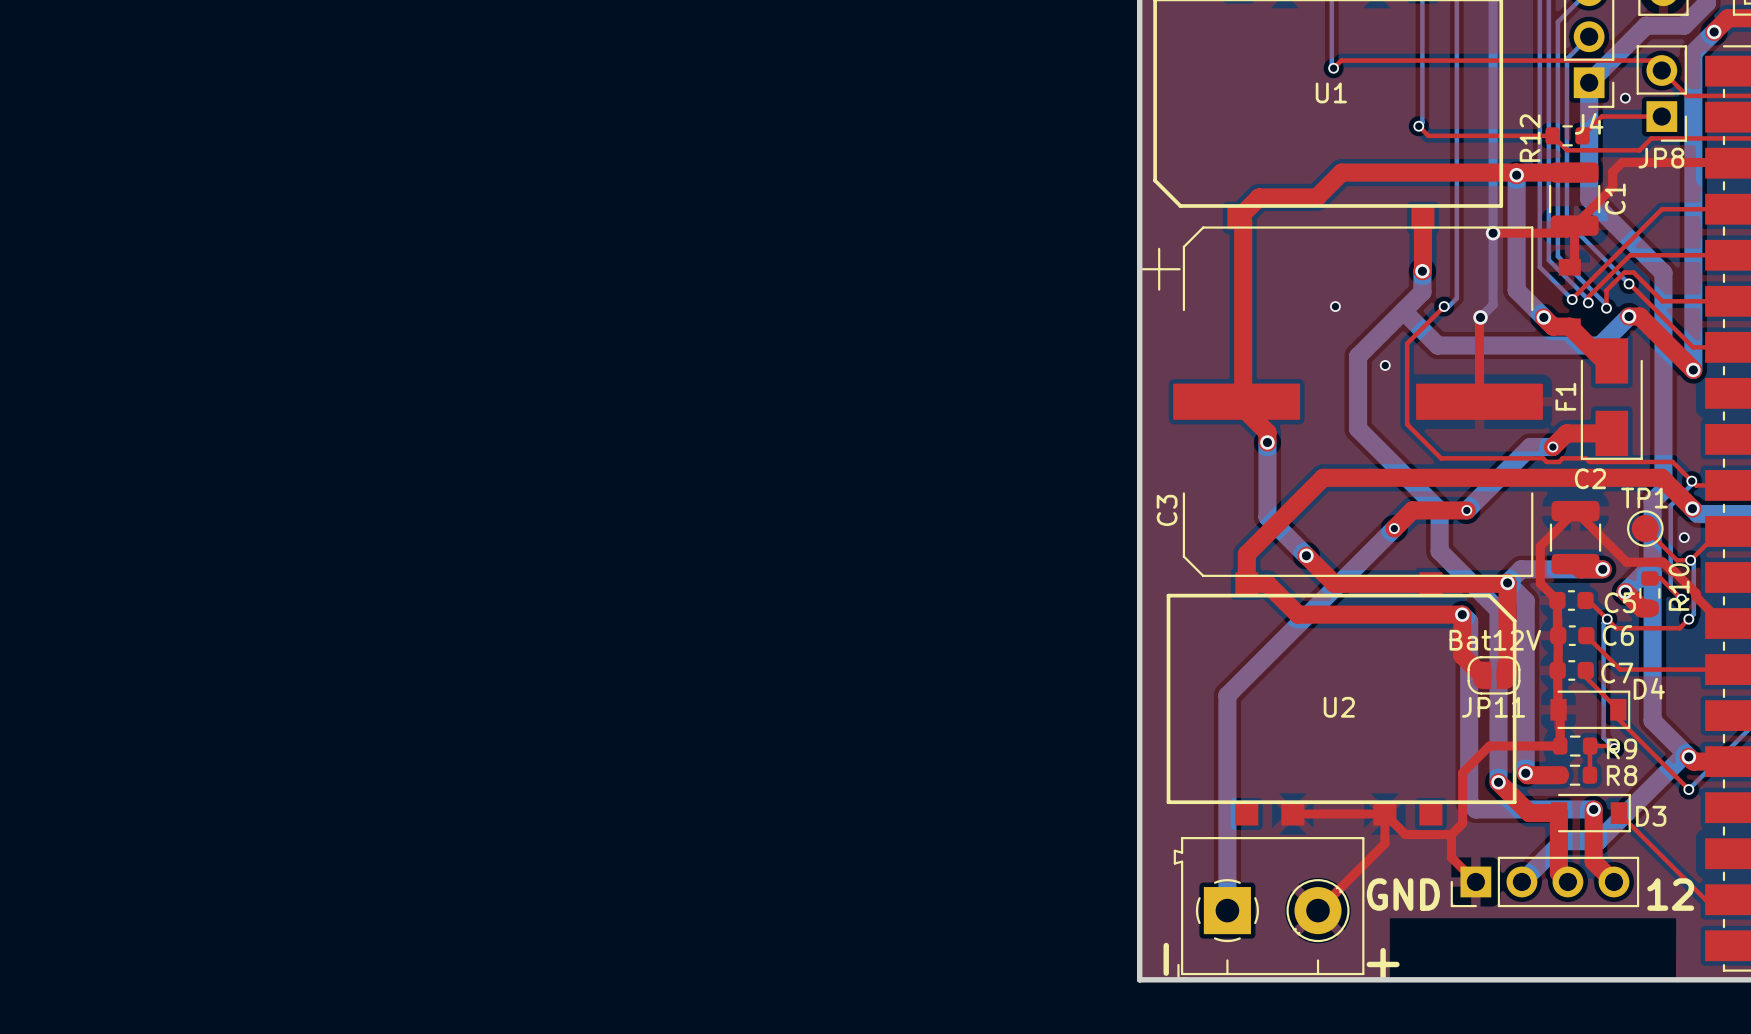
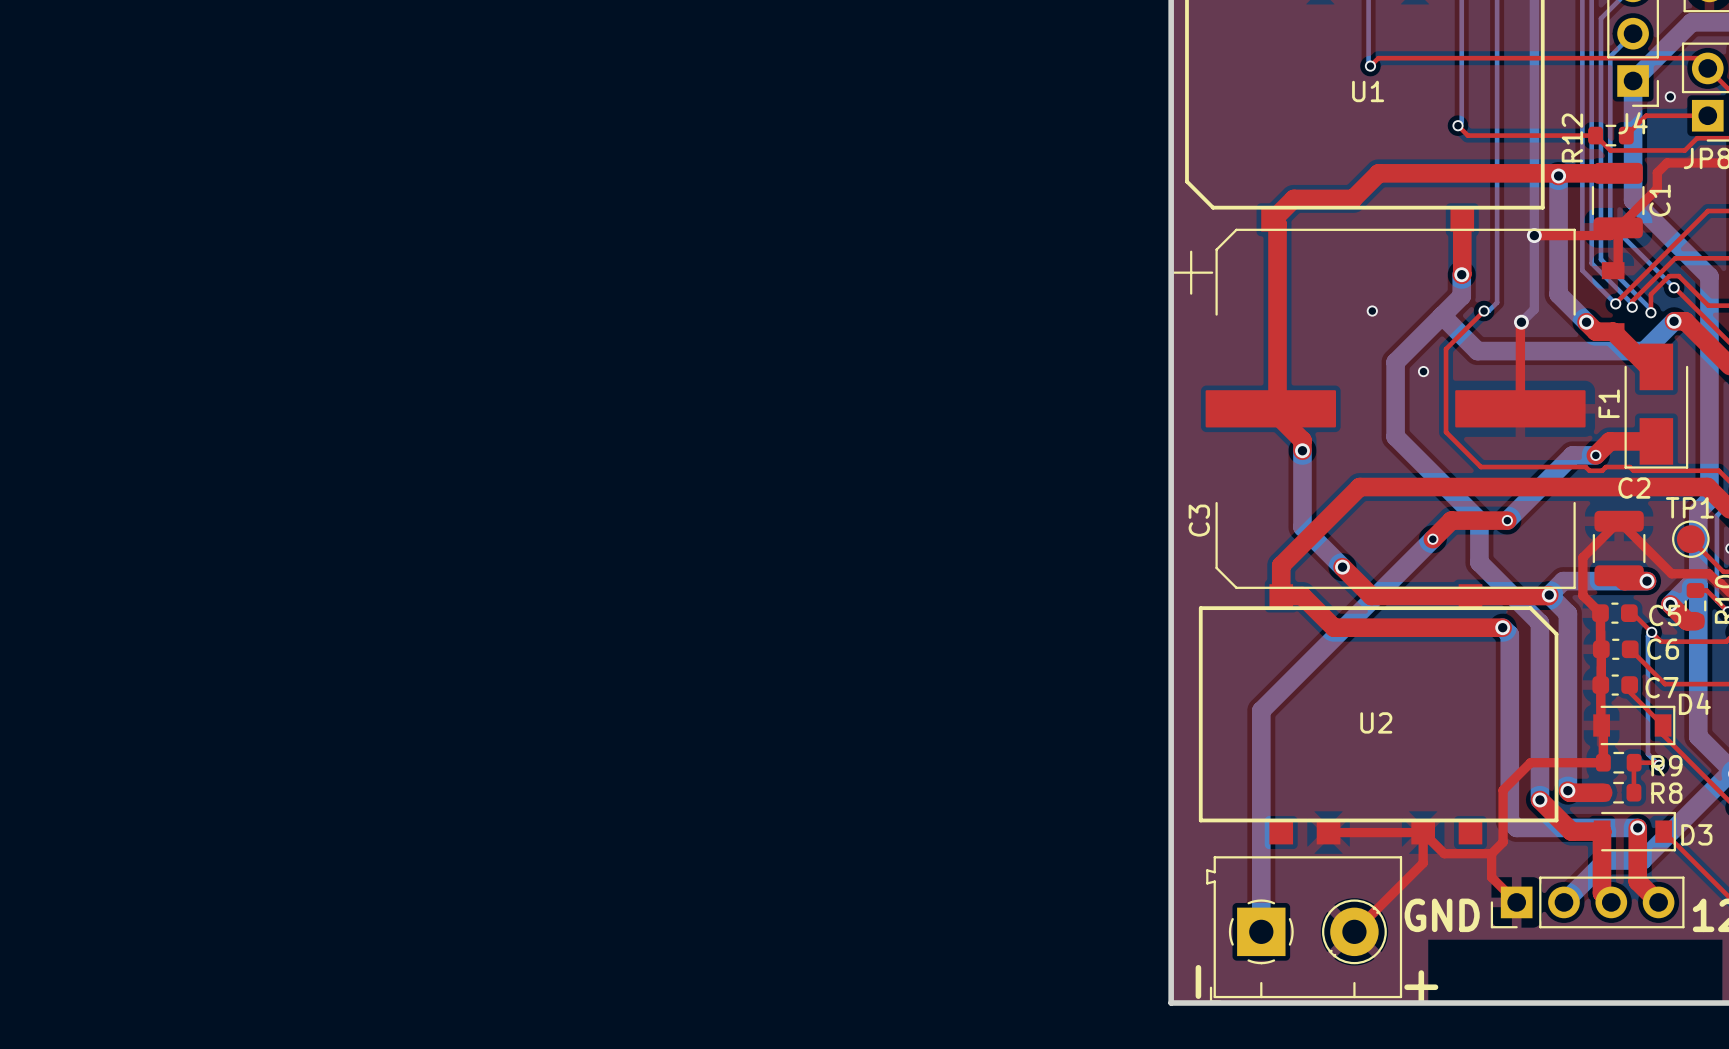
top track: (1507, 582) (1507, 673) (1505, 675) -> none
top track: (1462, 614) (1462, 655) (1482, 675) -> none
JP11: Bat12V (1494, 675) -> none

